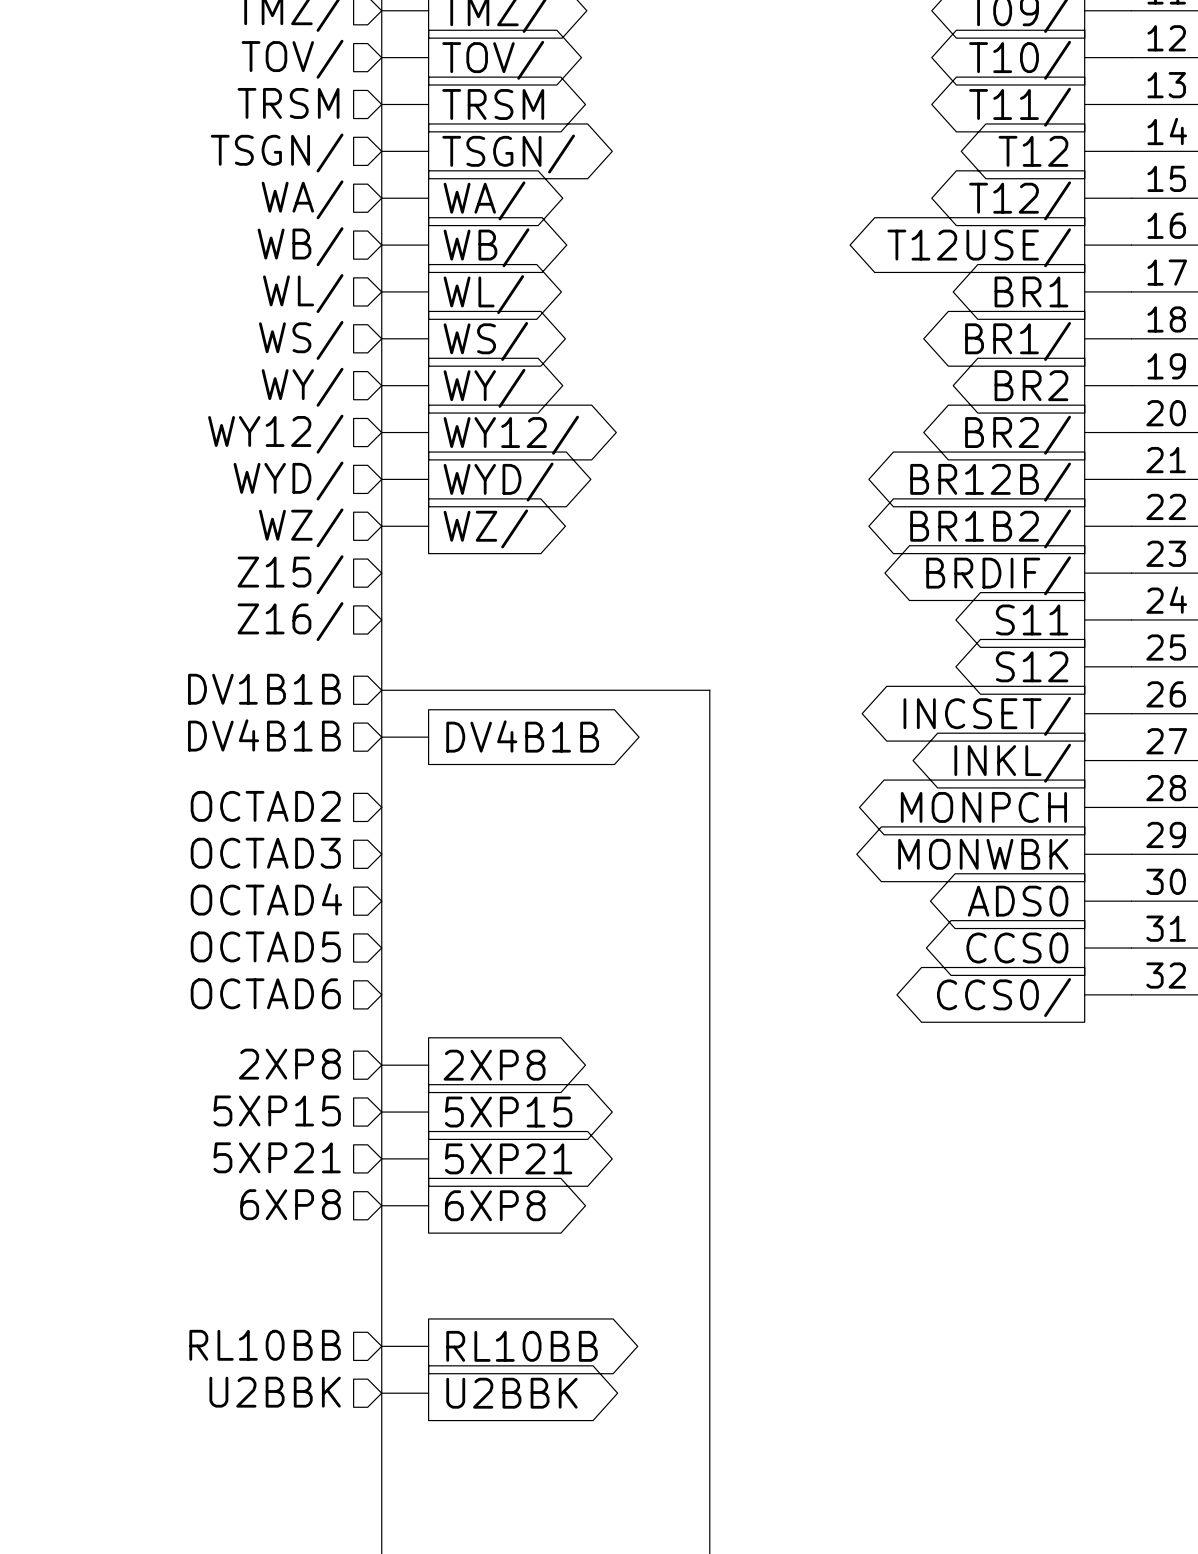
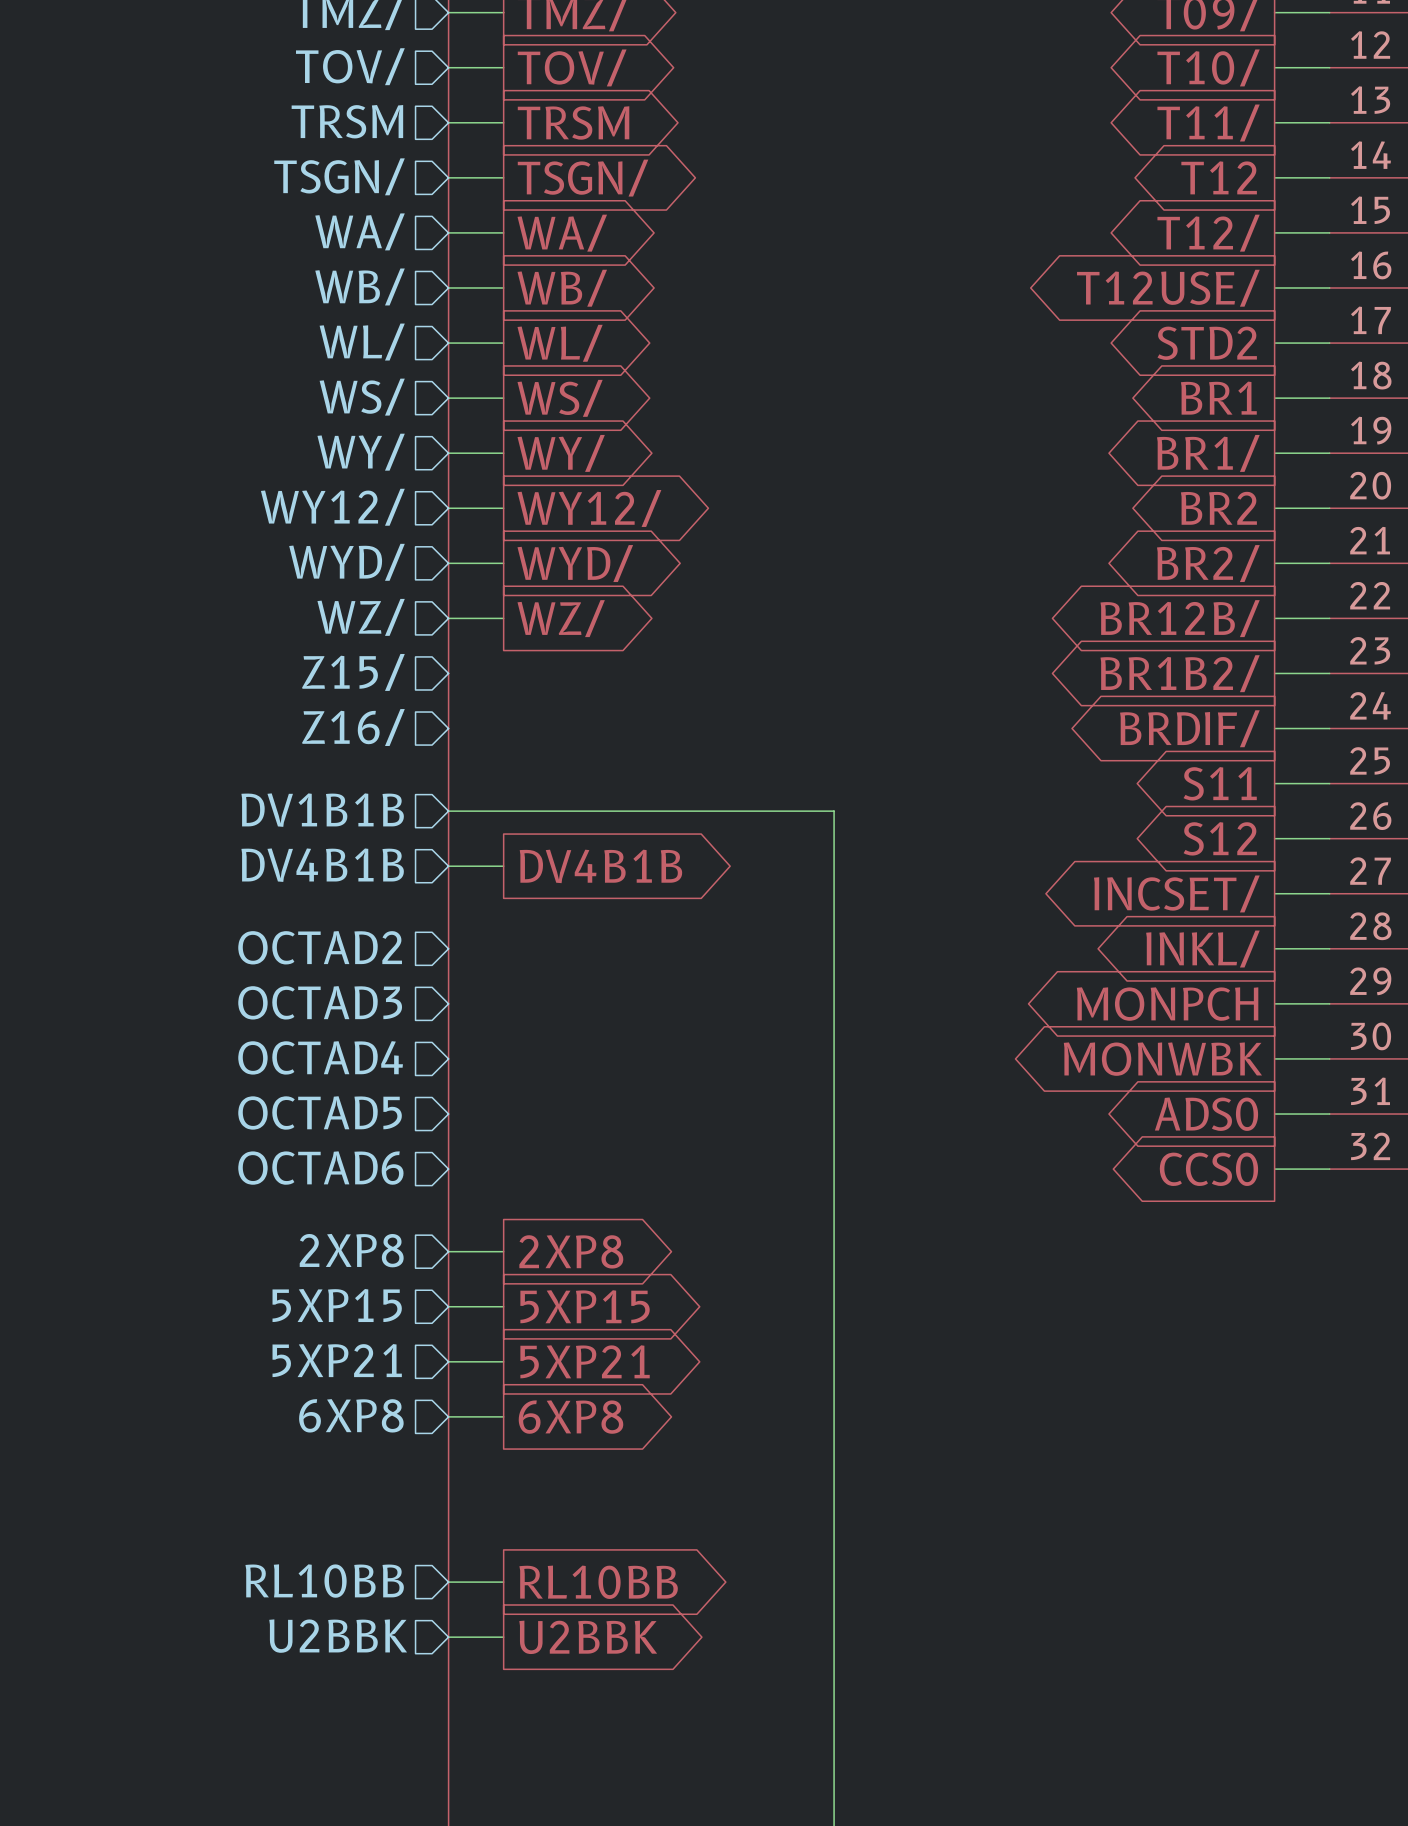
global label: BR1 (1031, 291) -> STD2 (1207, 343)
global label: BR1/ (1018, 341) -> BR1 (1218, 398)
global label: BR2 (1031, 385) -> BR1/ (1208, 453)
global label: BR2/ (1018, 435) -> BR2 (1218, 508)
global label: BR12B/ (990, 482) -> BR2/ (1208, 563)
global label: BR1B2/ (990, 528) -> BR12B/ (1180, 618)
global label: BRDIF/ (998, 575) -> BR1B2/ (1180, 673)
global label: S11 (1032, 619) -> BRDIF/ (1189, 728)
global label: S12 (1032, 666) -> S11 (1220, 783)
global label: INCSET/ (987, 716) -> S12 (1220, 838)
global label: INKL/ (1012, 763) -> INCSET/ (1176, 893)
global label: MONPCH (983, 807) -> INKL/ (1202, 949)
global label: MONWBK (983, 854) -> MONPCH (1167, 1004)
global label: ADS0 (1018, 901) -> MONWBK (1162, 1059)
global label: CCS0 (1017, 948) -> ADS0 (1206, 1114)
global label: CCS0/ (1004, 997) -> CCS0 (1208, 1169)

